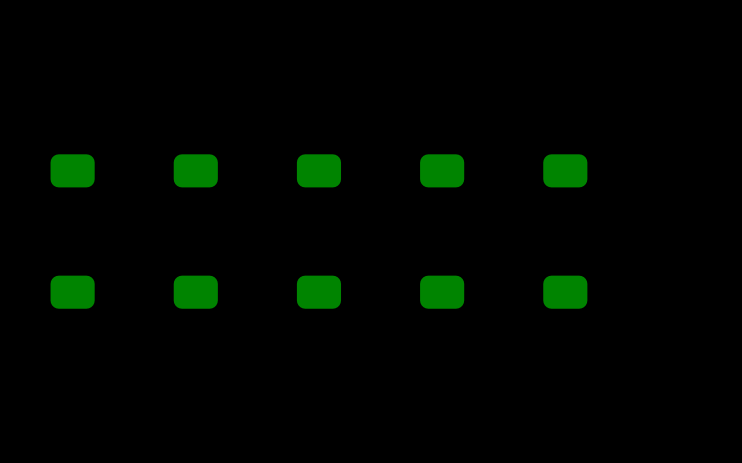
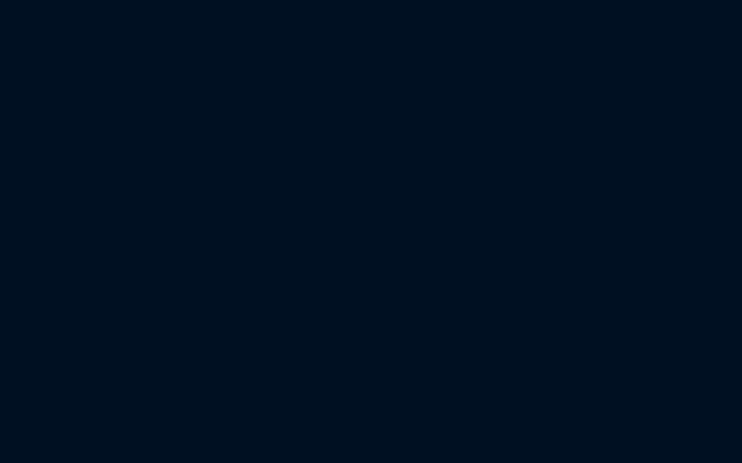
part: (72, 231) -> none
part: (195, 231) -> none
part: (318, 231) -> none
part: (442, 231) -> none
part: (565, 231) -> none

